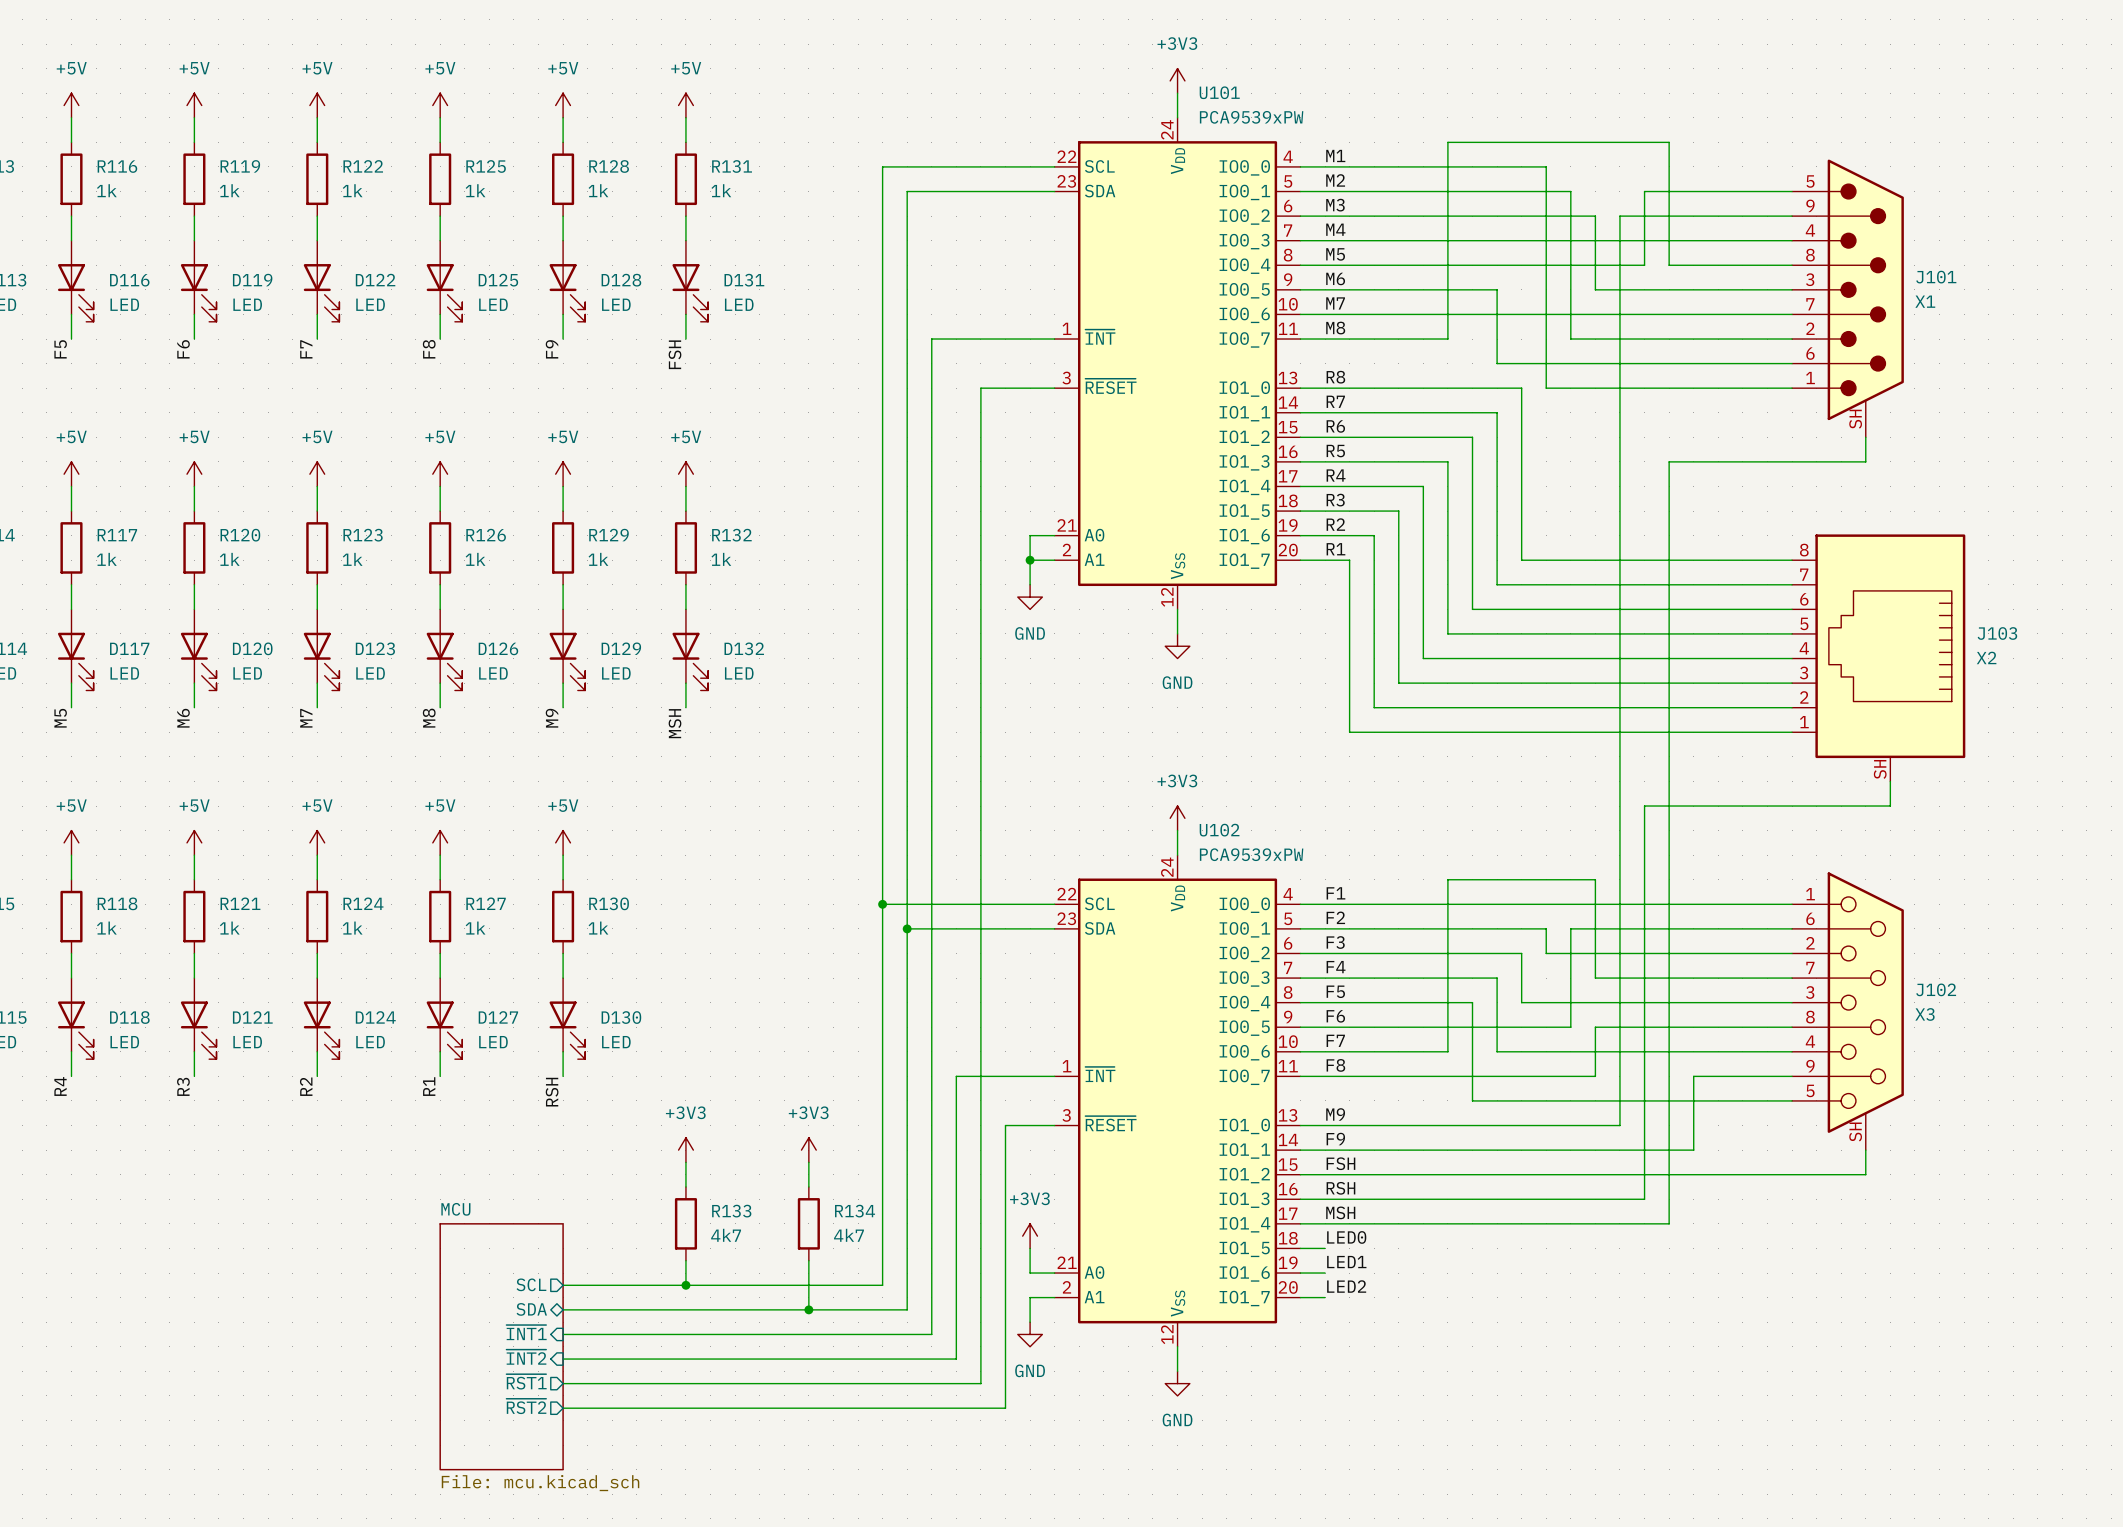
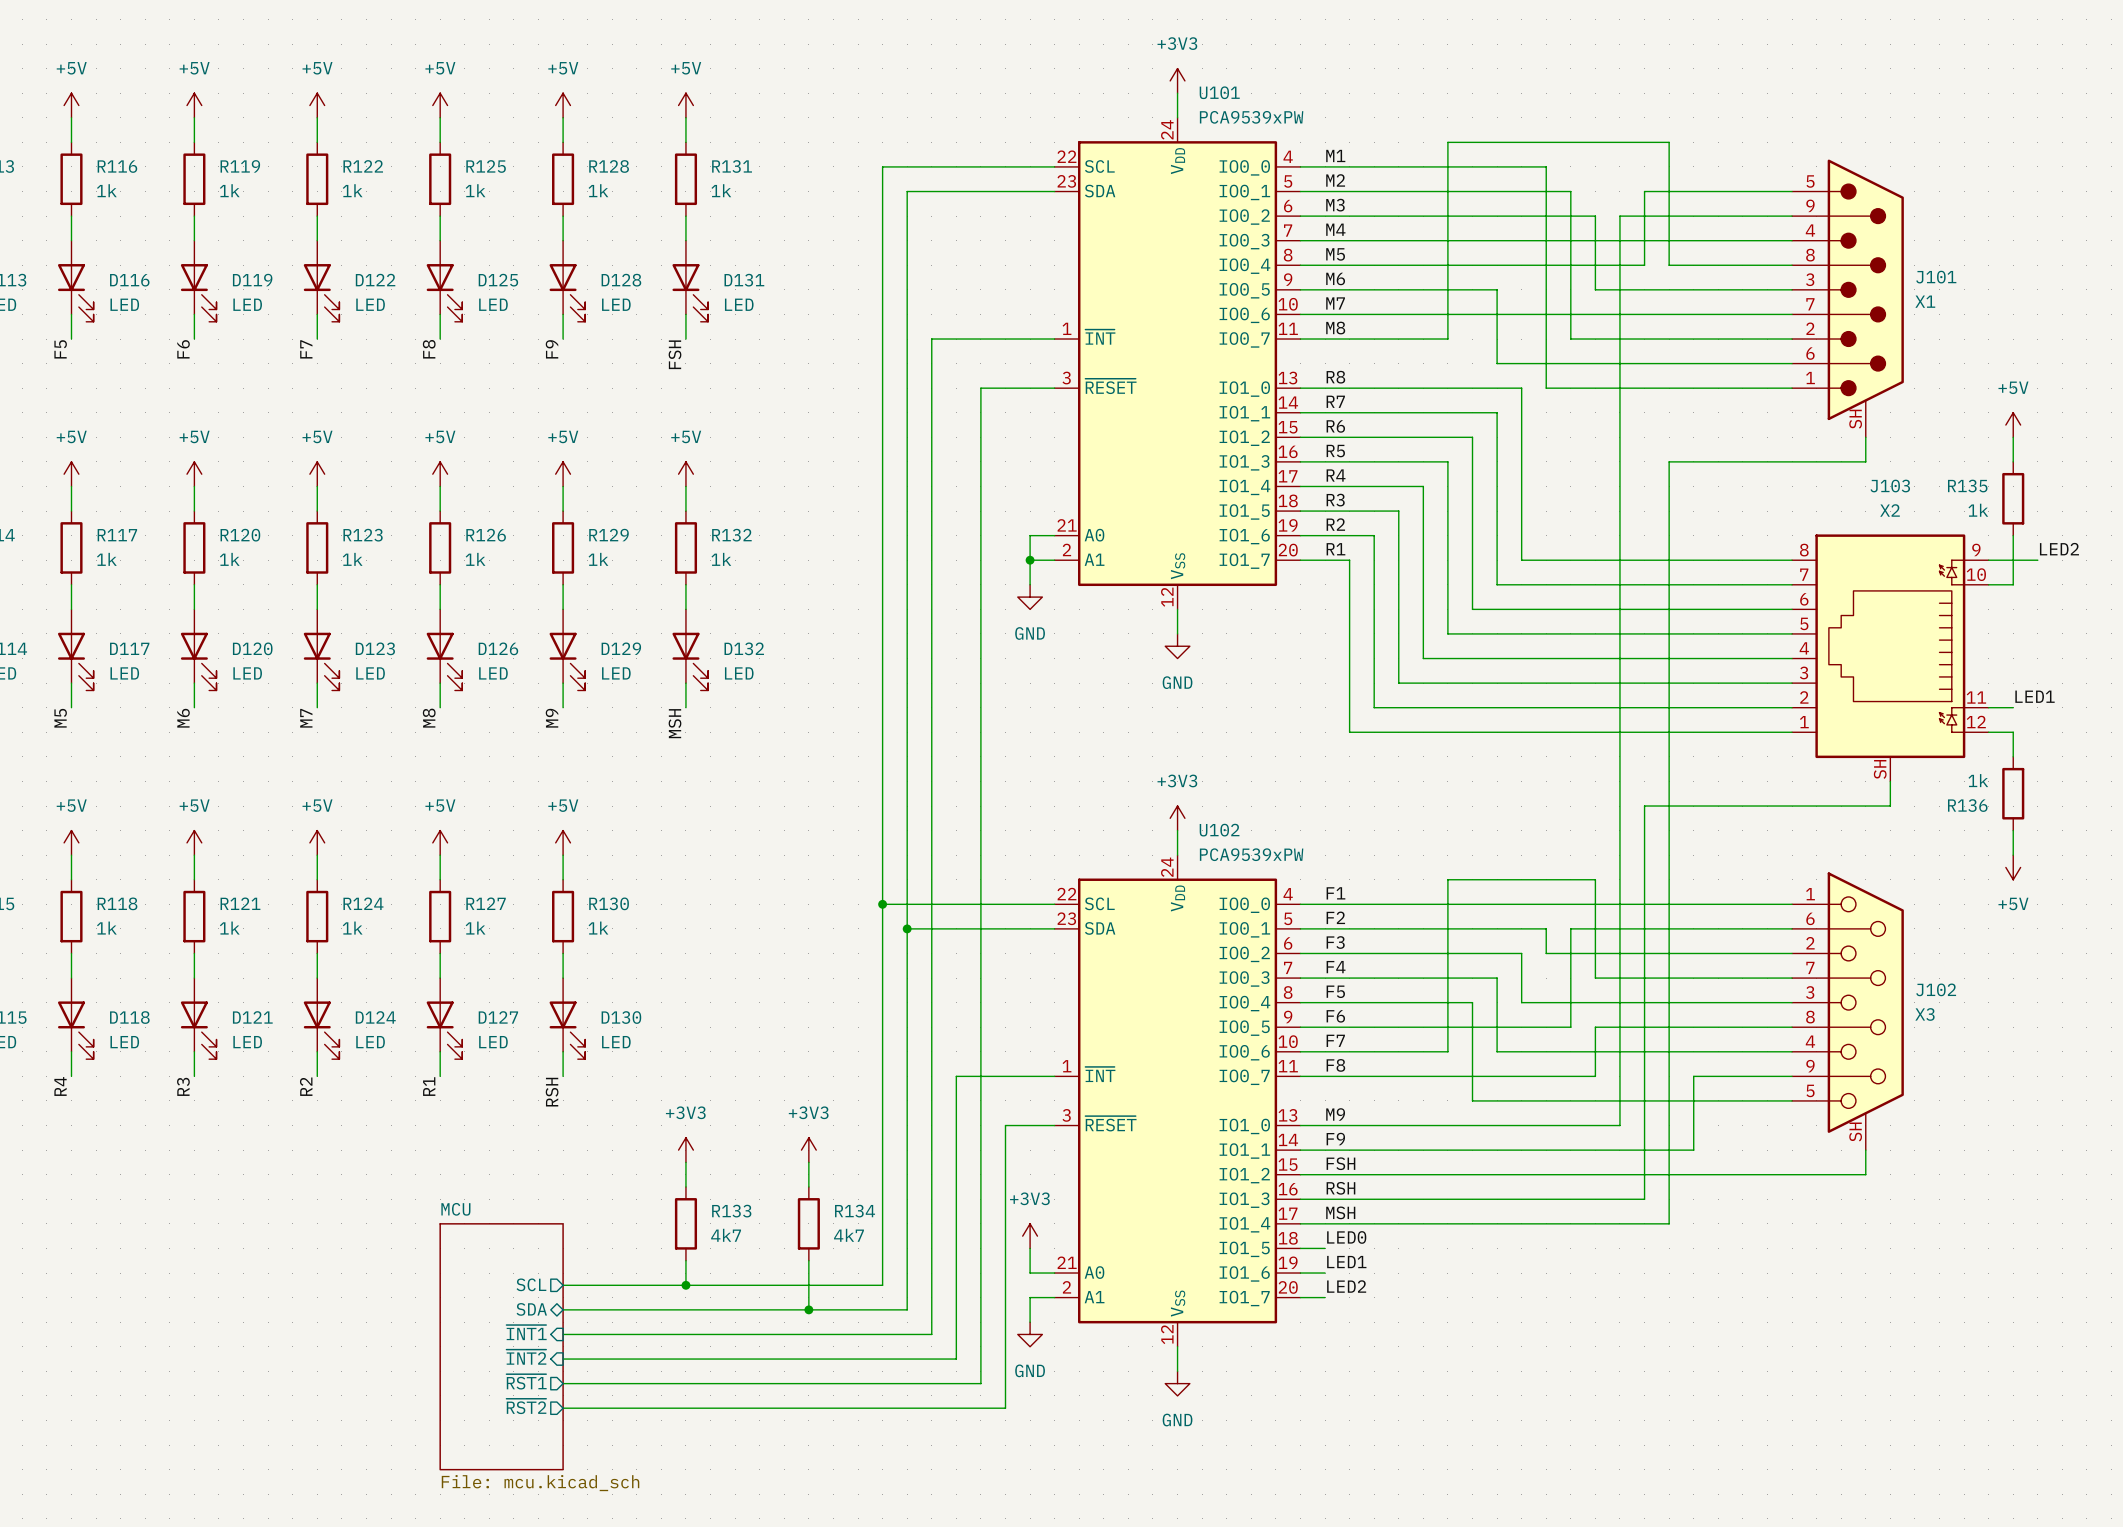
power symbol: none -> +5V (2013, 425)
wire: none -> (2013, 437) (2013, 461)
R135: none -> 1k (2013, 498)
J103 symbol: [1792, 534, 1966, 782] -> [1792, 534, 1989, 782]
wire: none -> (2013, 535) (2013, 584) (1988, 584)
label: none -> LED2 (2059, 549)
wire: none -> (1988, 560) (2037, 560)
J103 name position: J103 (1997, 633) -> J103 (1890, 486)
J103 value position: X2 (1986, 657) -> X2 (1890, 510)
label: none -> LED1 (2035, 696)
wire: none -> (1988, 707) (2013, 707)
wire: none -> (1988, 732) (2013, 732) (2013, 756)
R136: none -> 1k (2013, 793)
wire: none -> (2013, 830) (2013, 855)
power symbol: none -> +5V (2013, 867)

